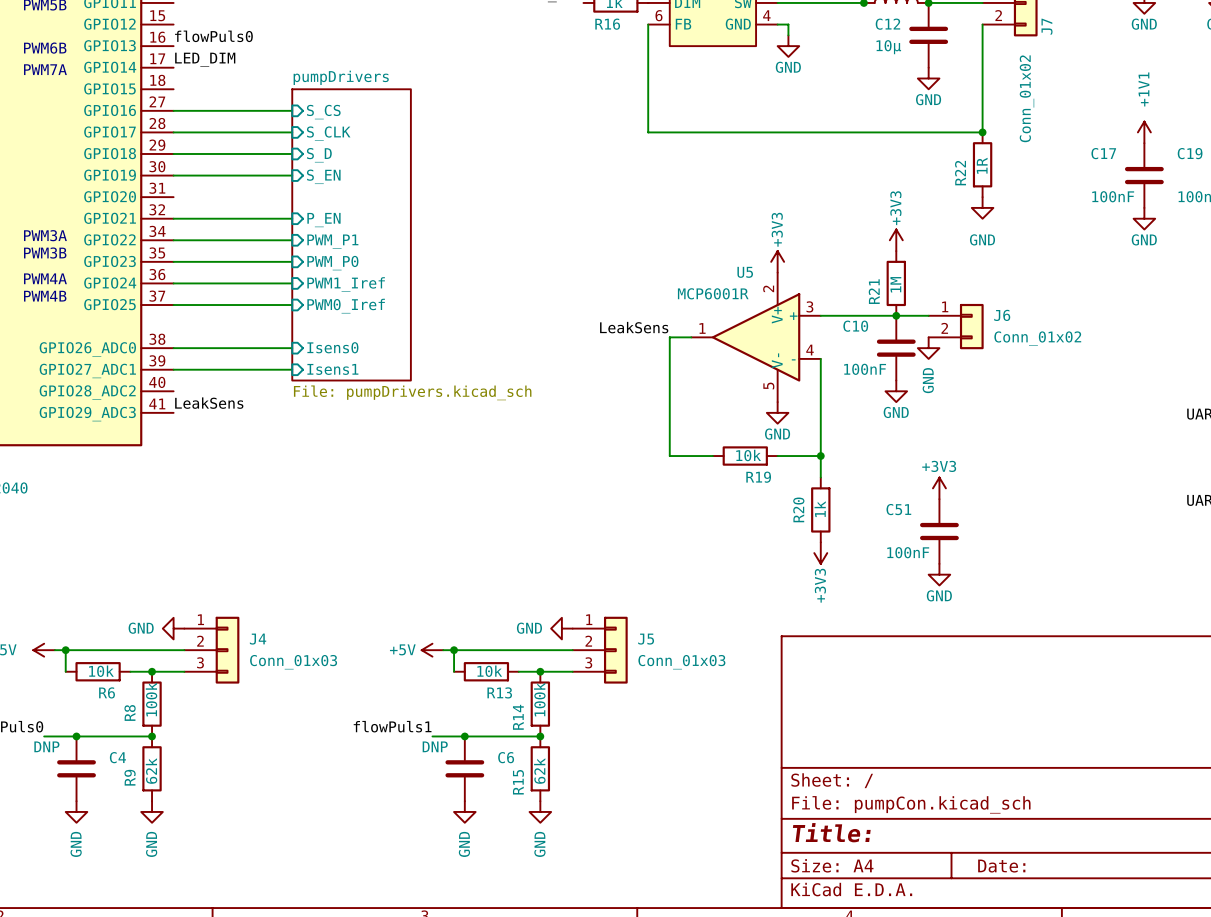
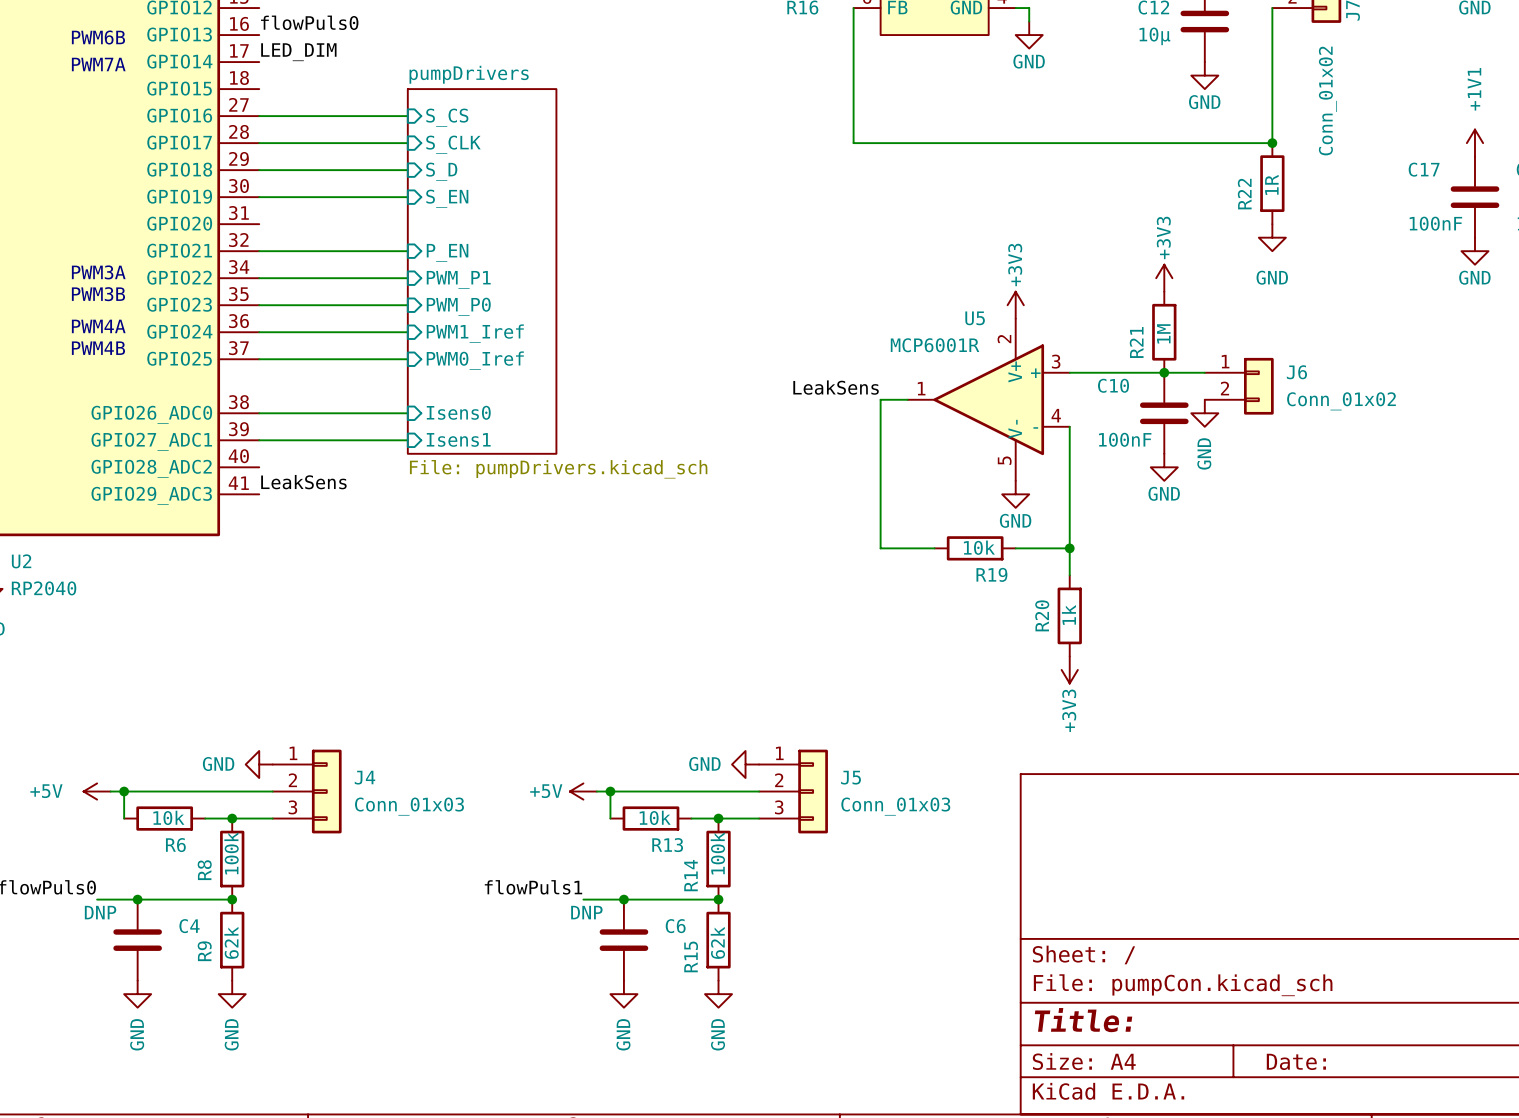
power symbol: +3V3 (939, 488) -> none
C51: 100nF (939, 531) -> none
power symbol: GND (939, 574) -> none

